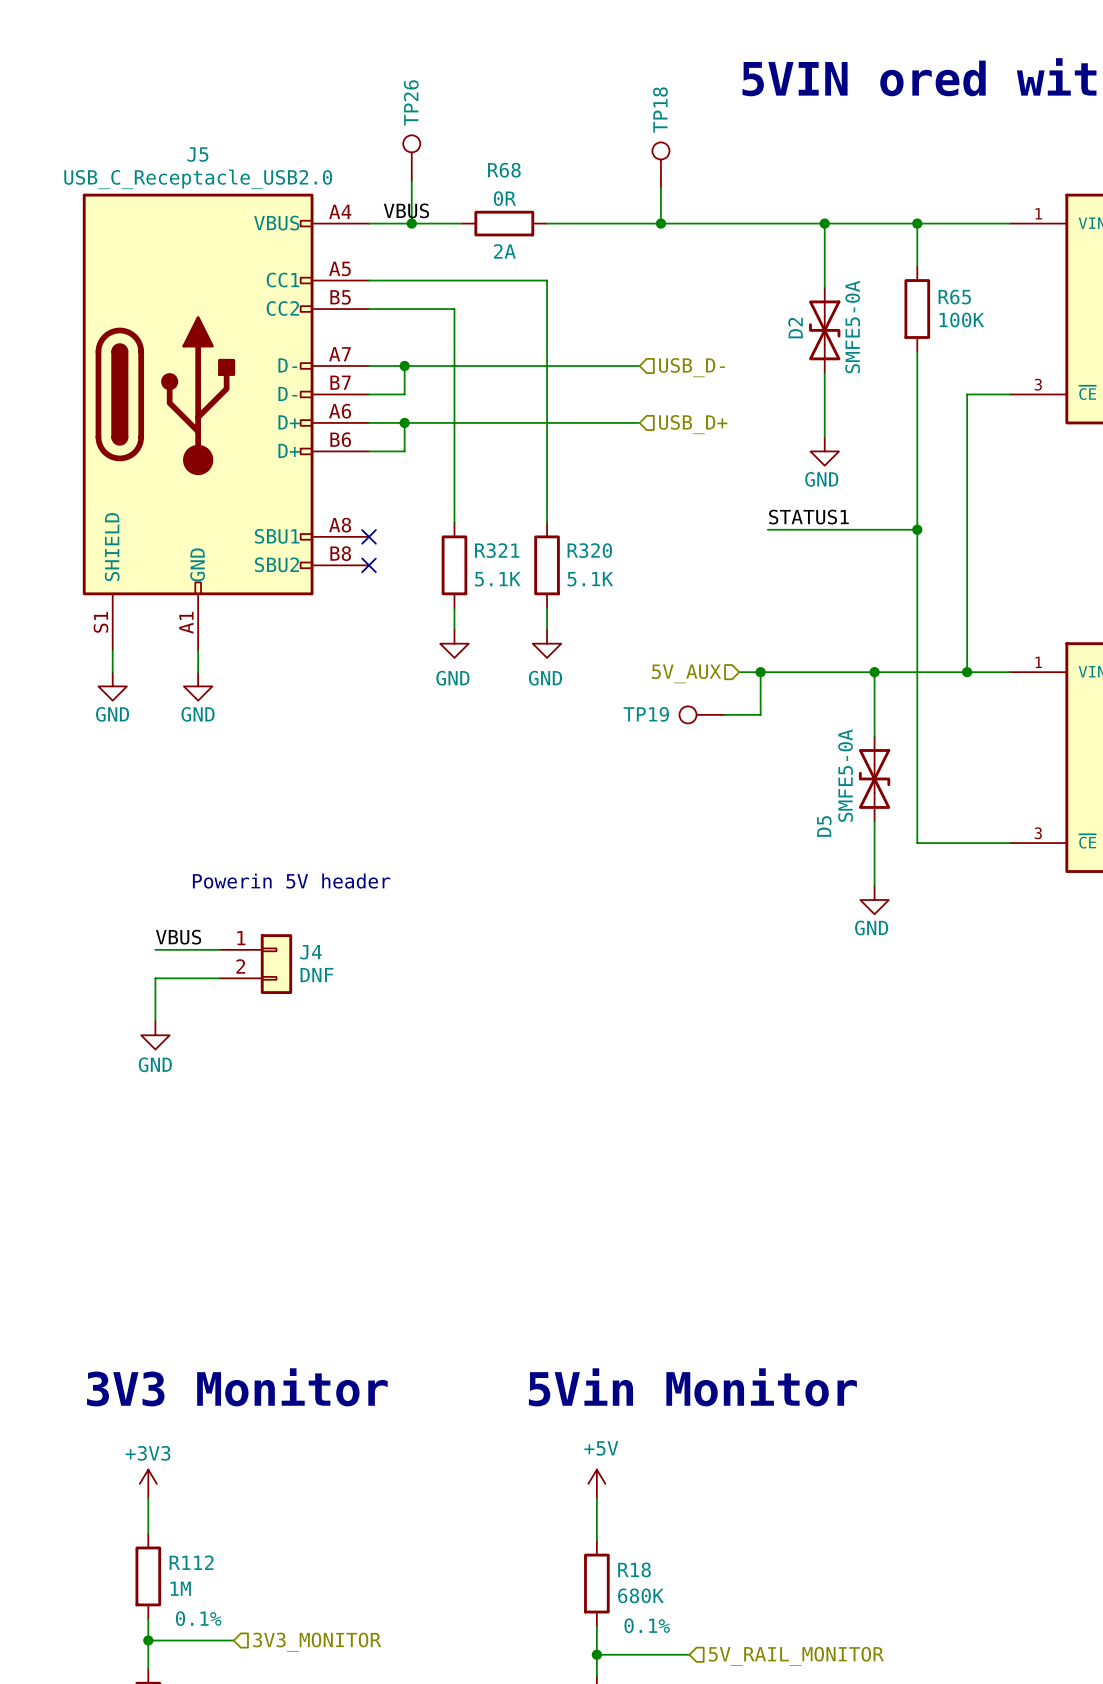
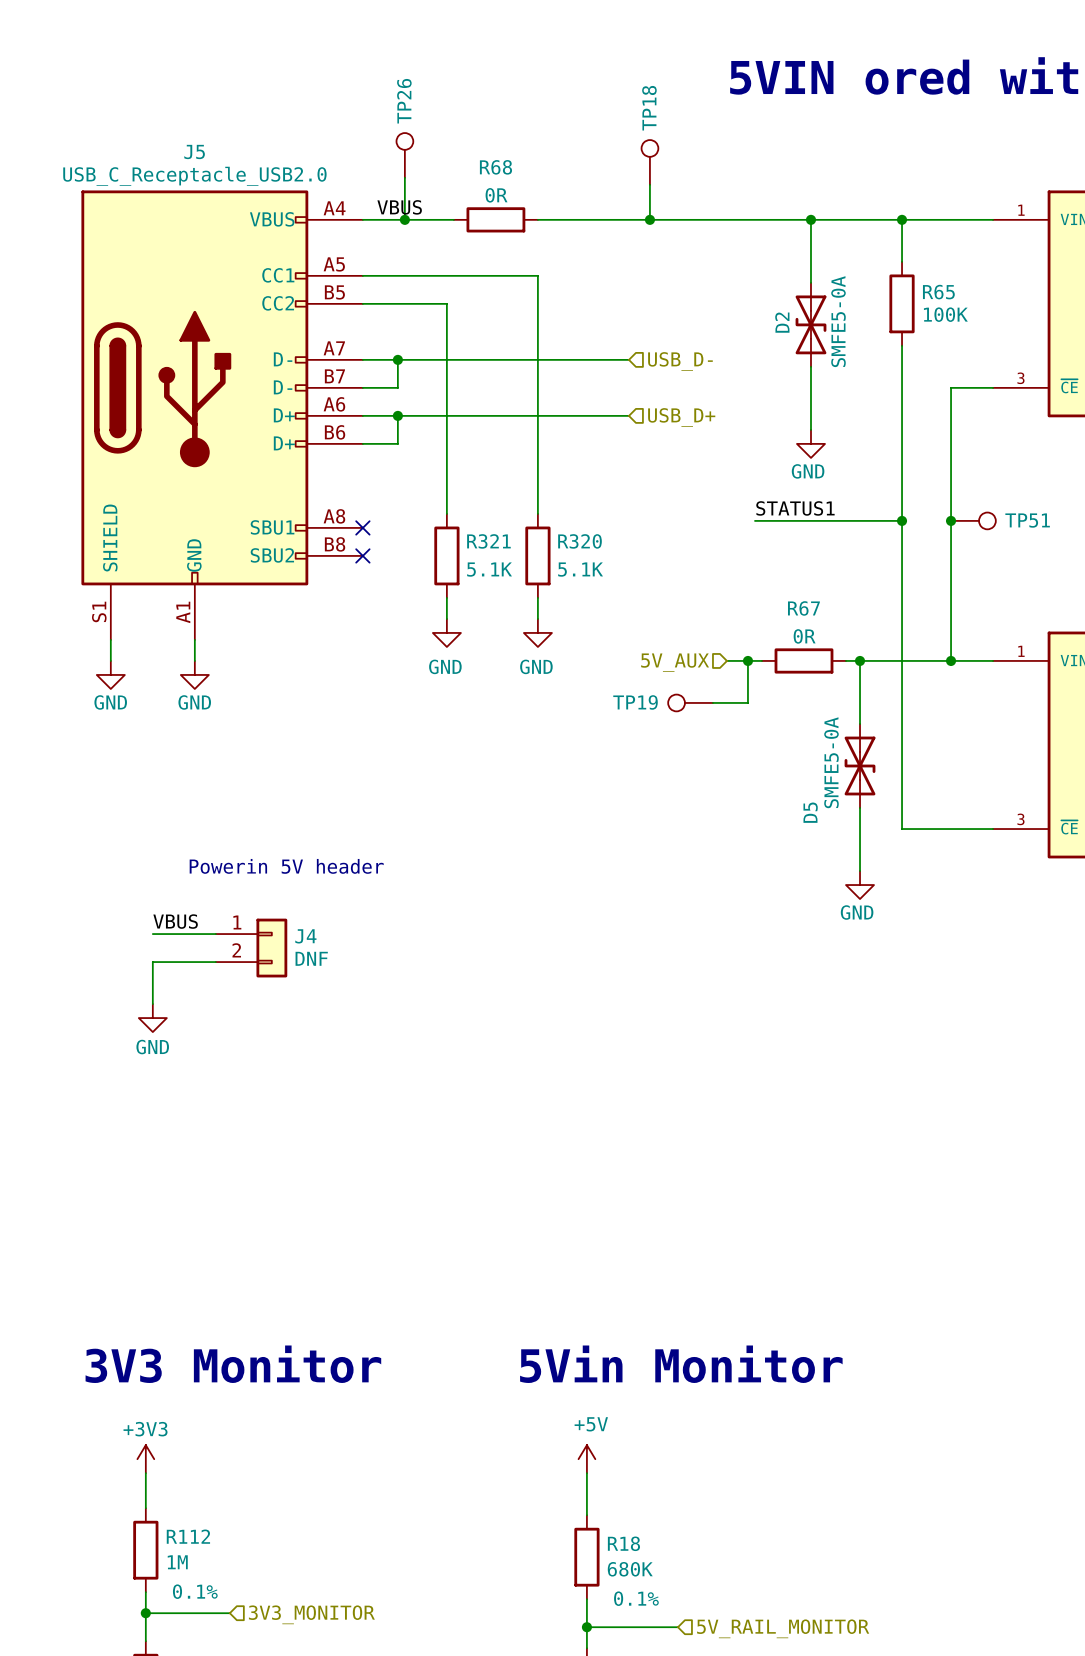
R68 text: 2A (504, 251) -> none
junction: none -> (951, 520)
TP51: none -> (973, 520)
wire: (774, 672) (860, 672) -> none
R67: none -> 0R (803, 660)

